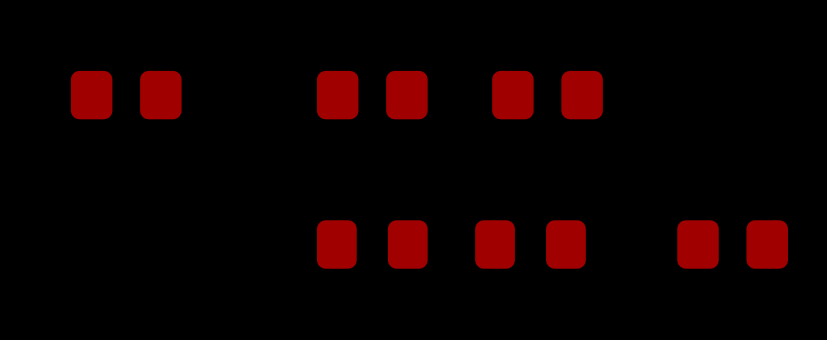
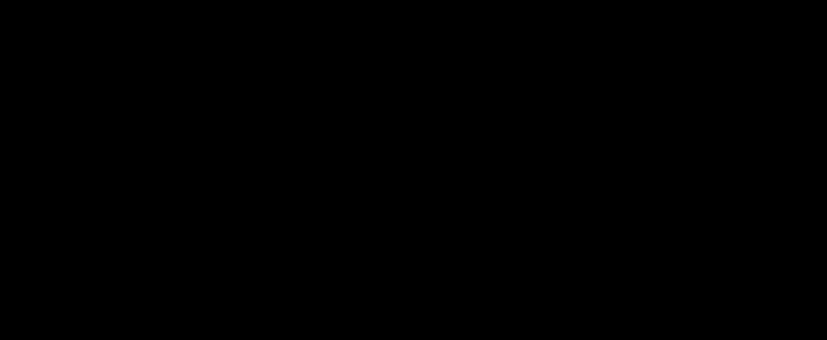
part: (126, 95) -> none
part: (372, 95) -> none
part: (547, 95) -> none
part: (372, 244) -> none
part: (530, 244) -> none
part: (732, 244) -> none

